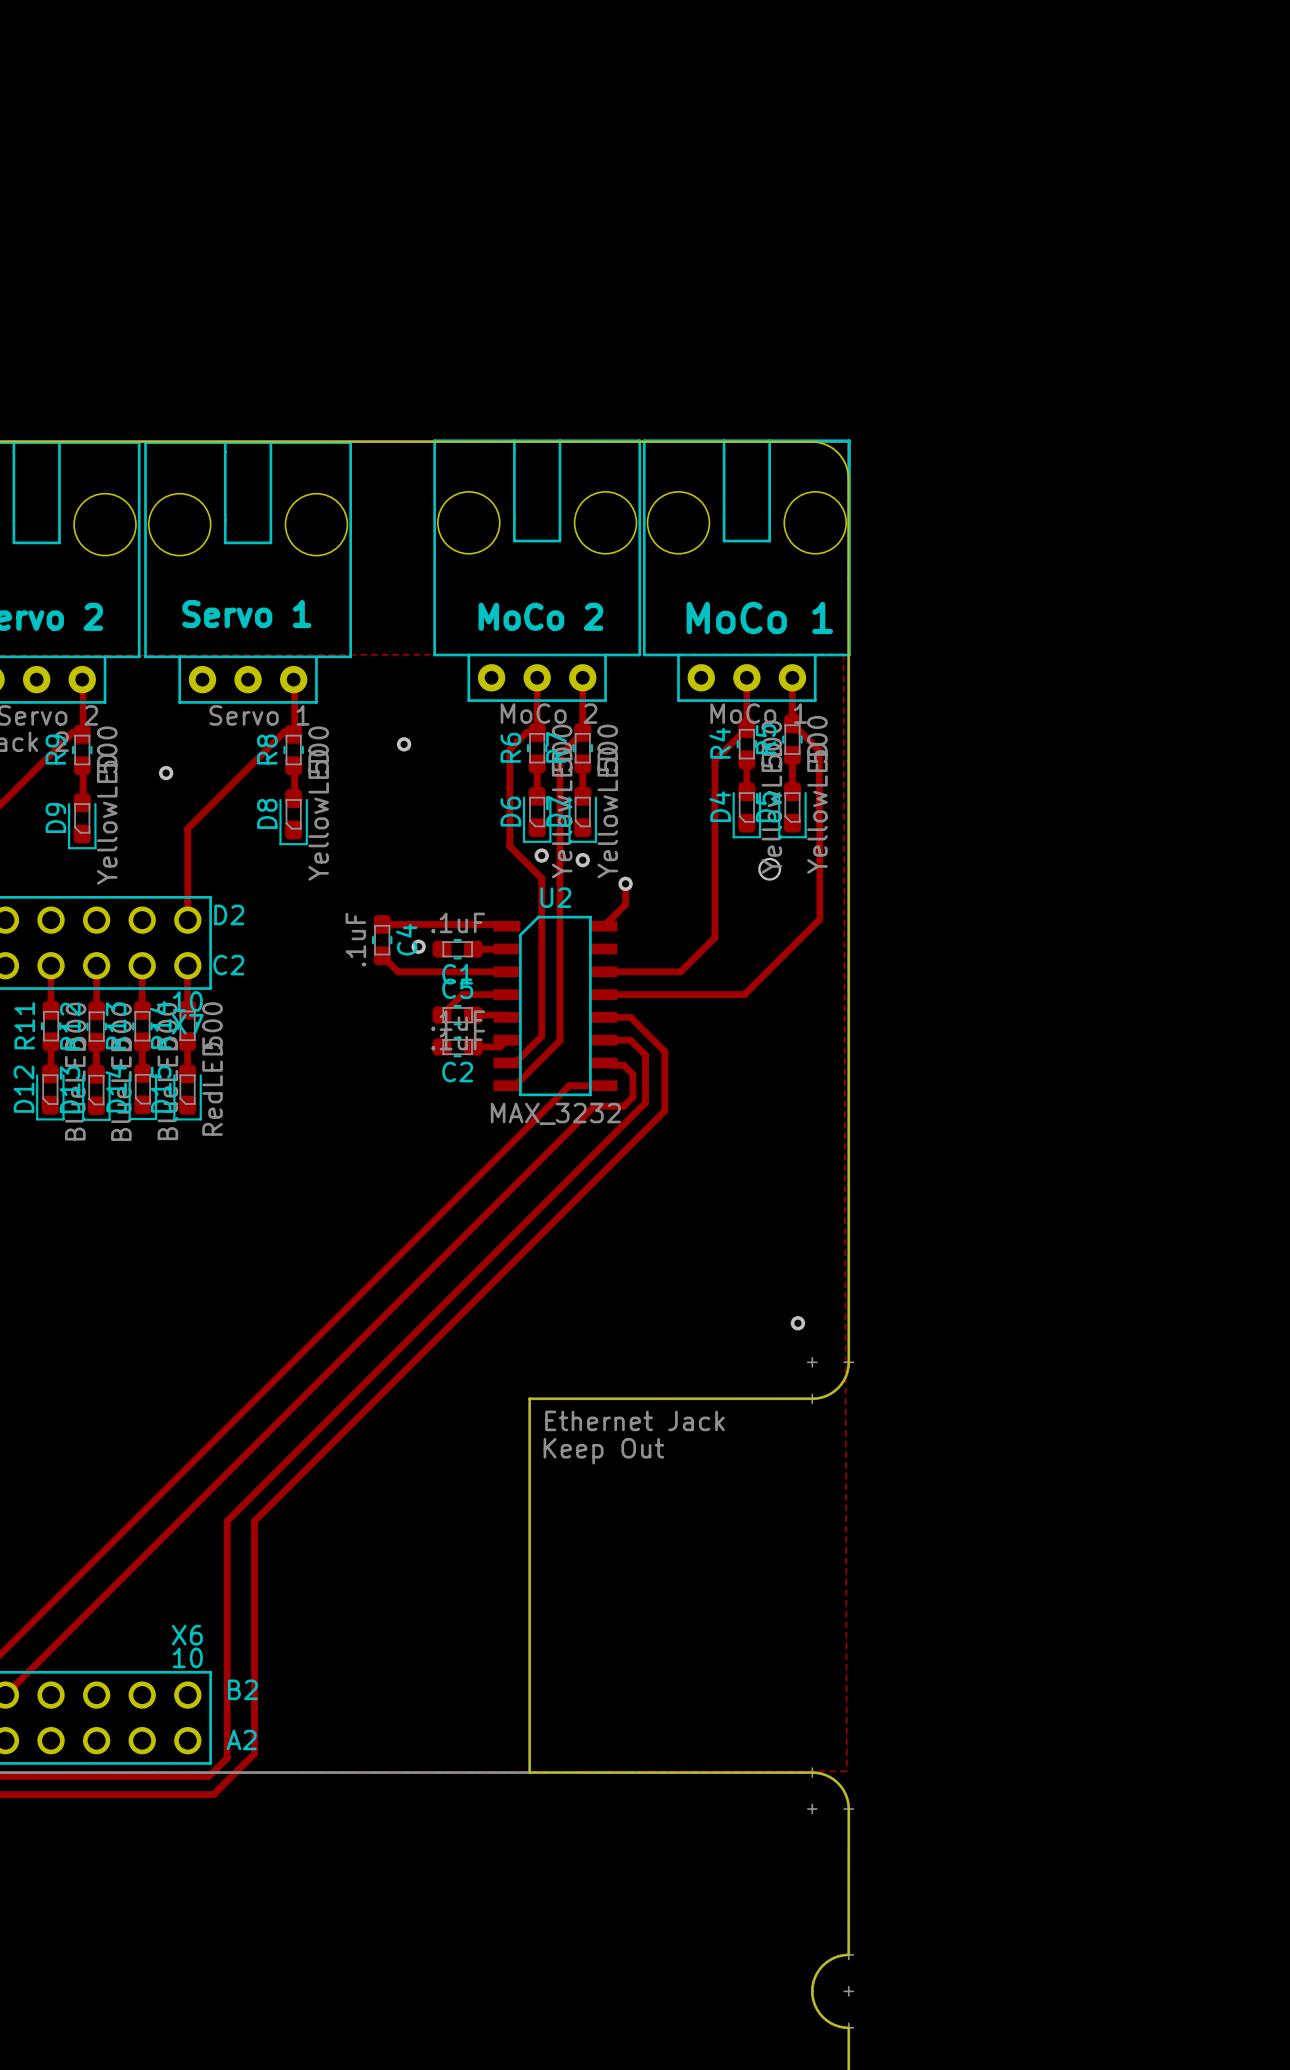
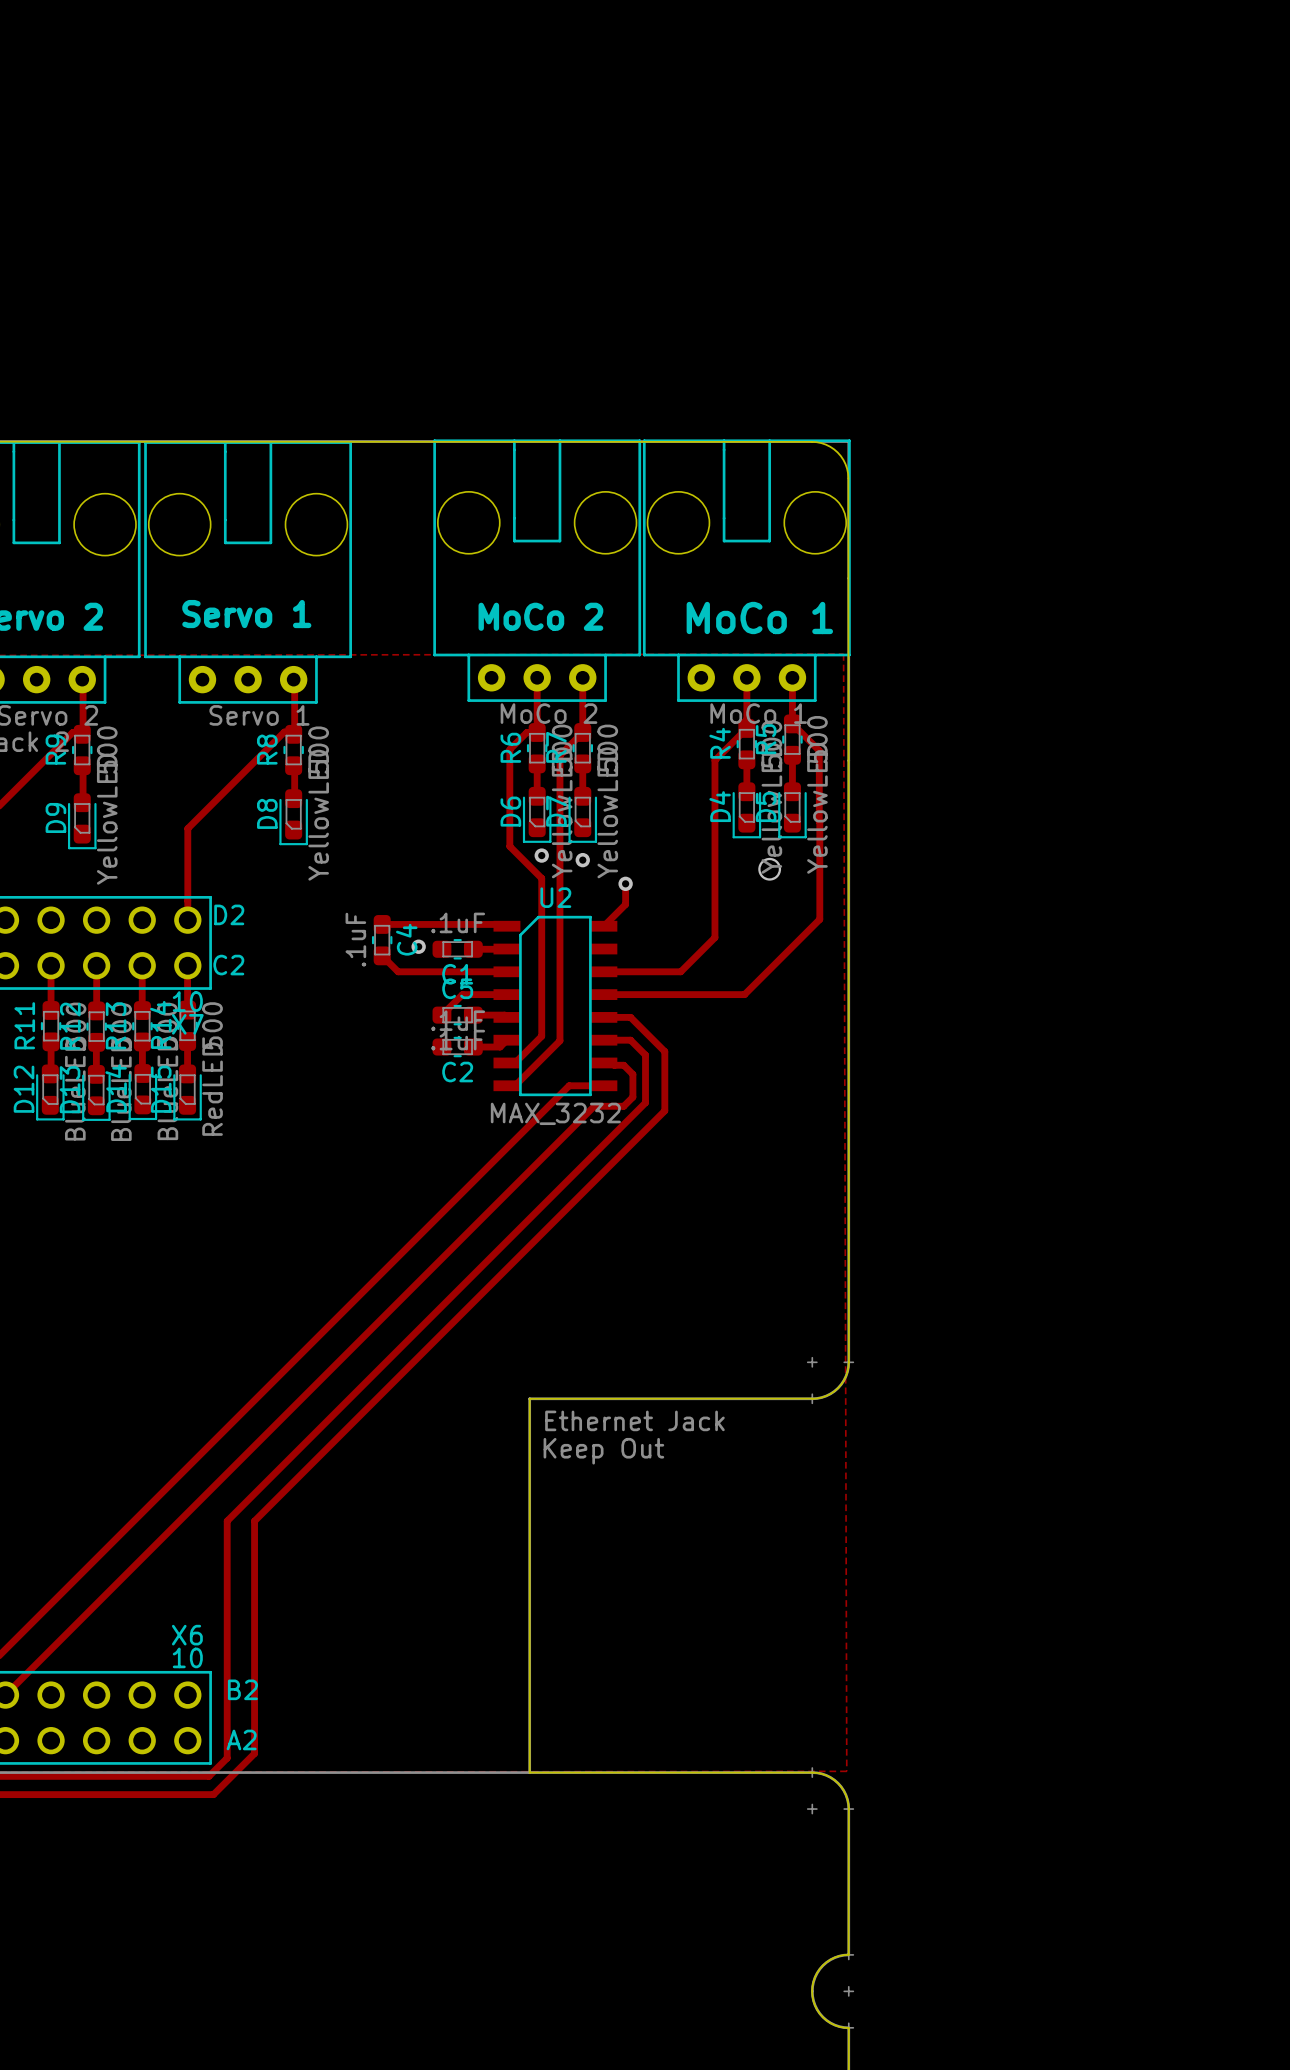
via: (404, 744) -> none
via: (166, 773) -> none
via: (797, 1323) -> none

